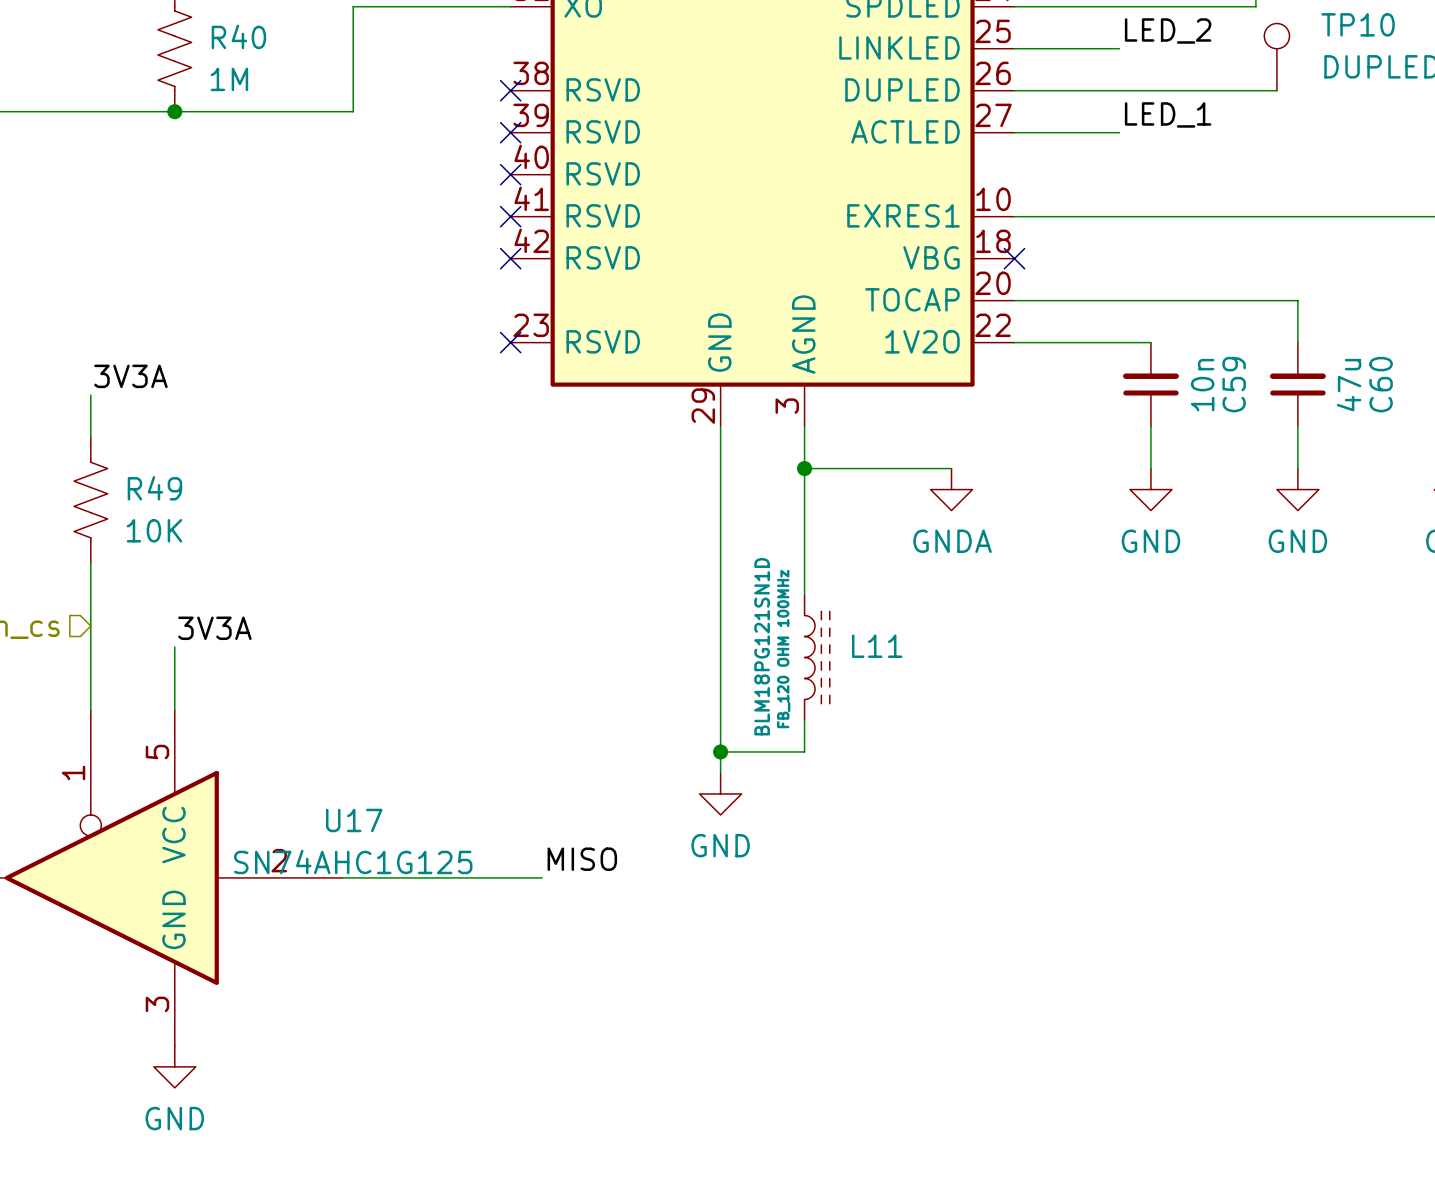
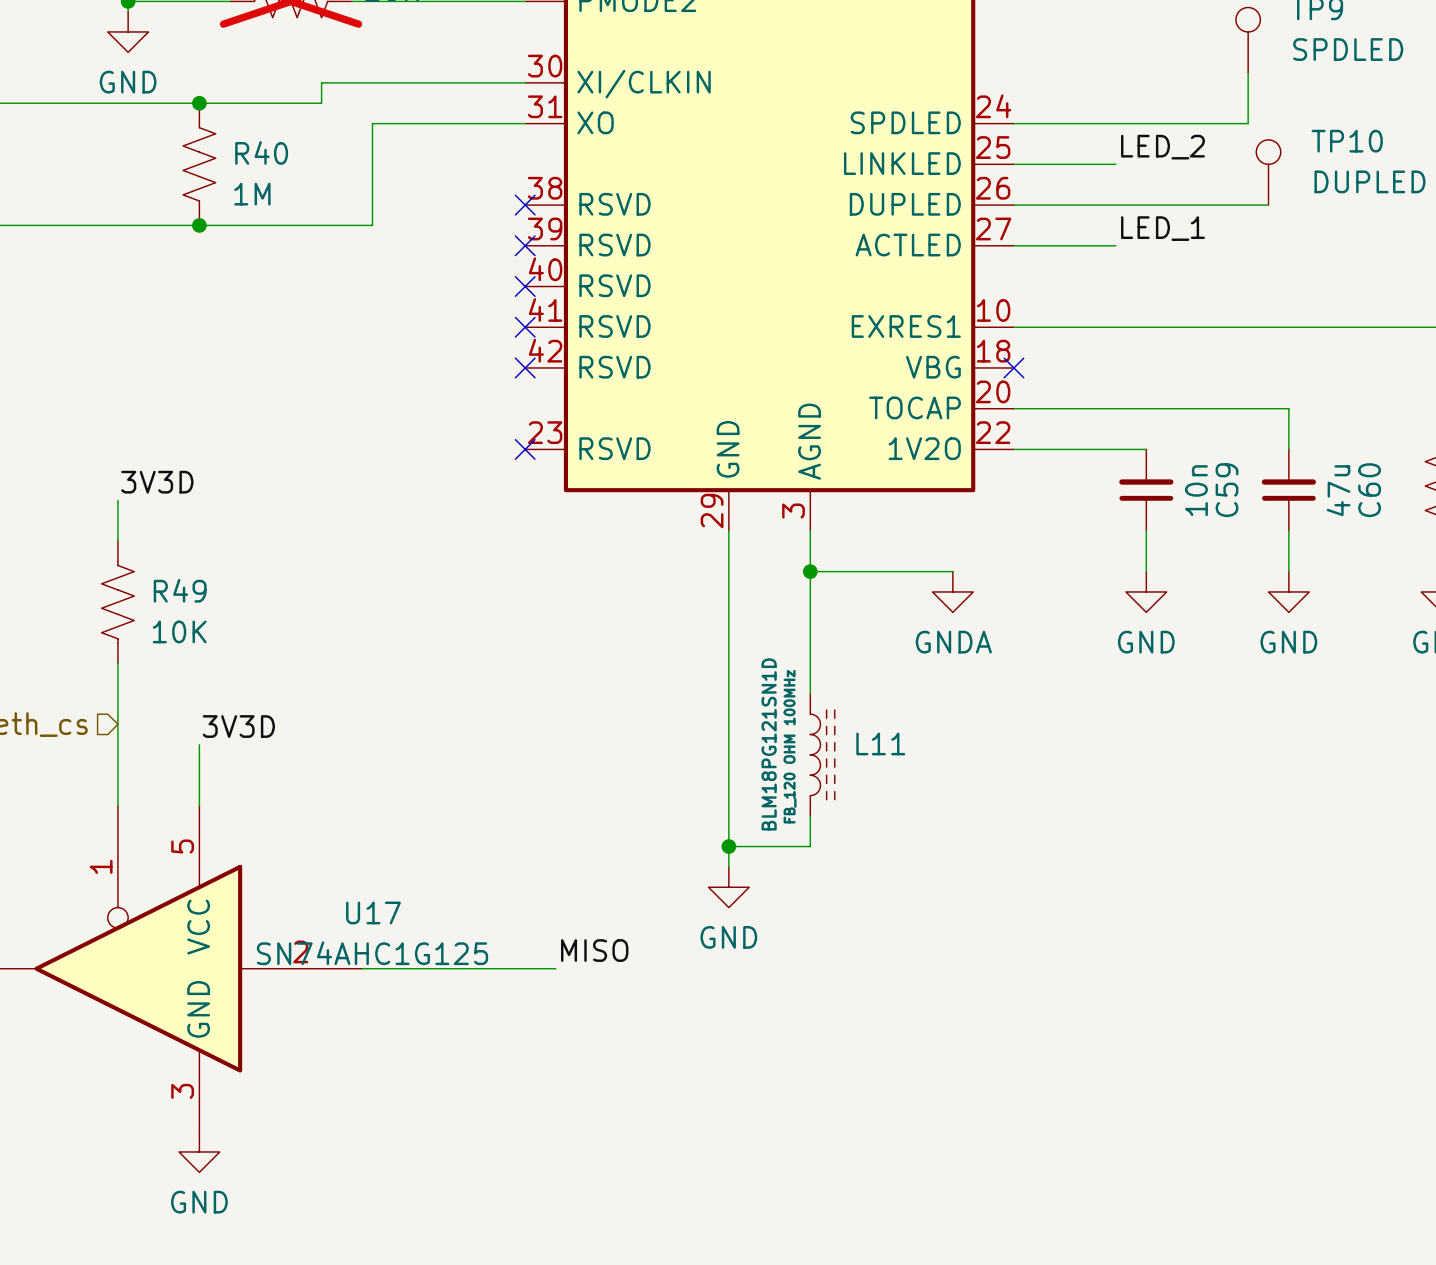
label: 3V3A (130, 376) -> 3V3D (157, 482)
label: 3V3A (214, 628) -> 3V3D (238, 726)

